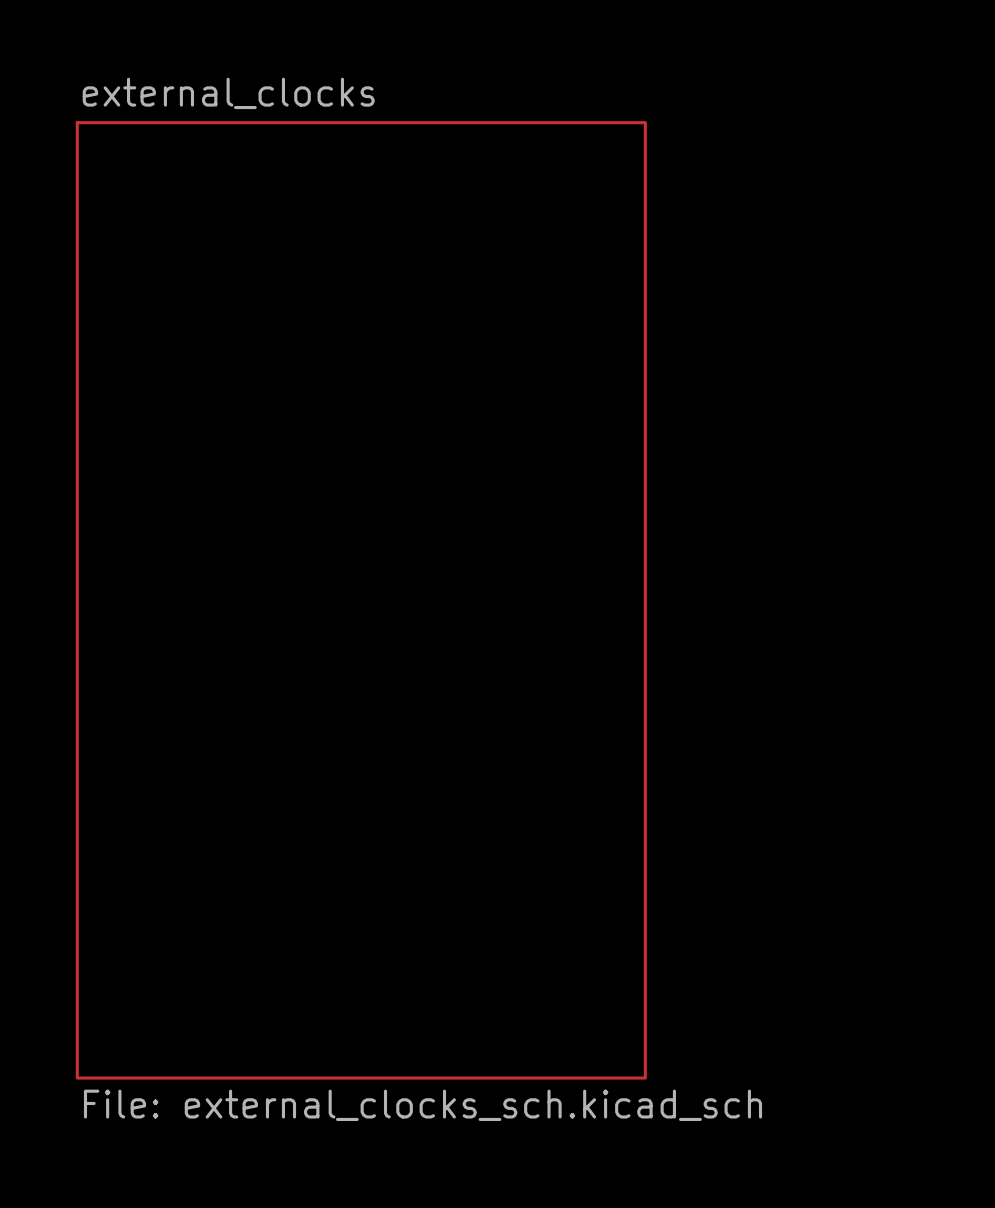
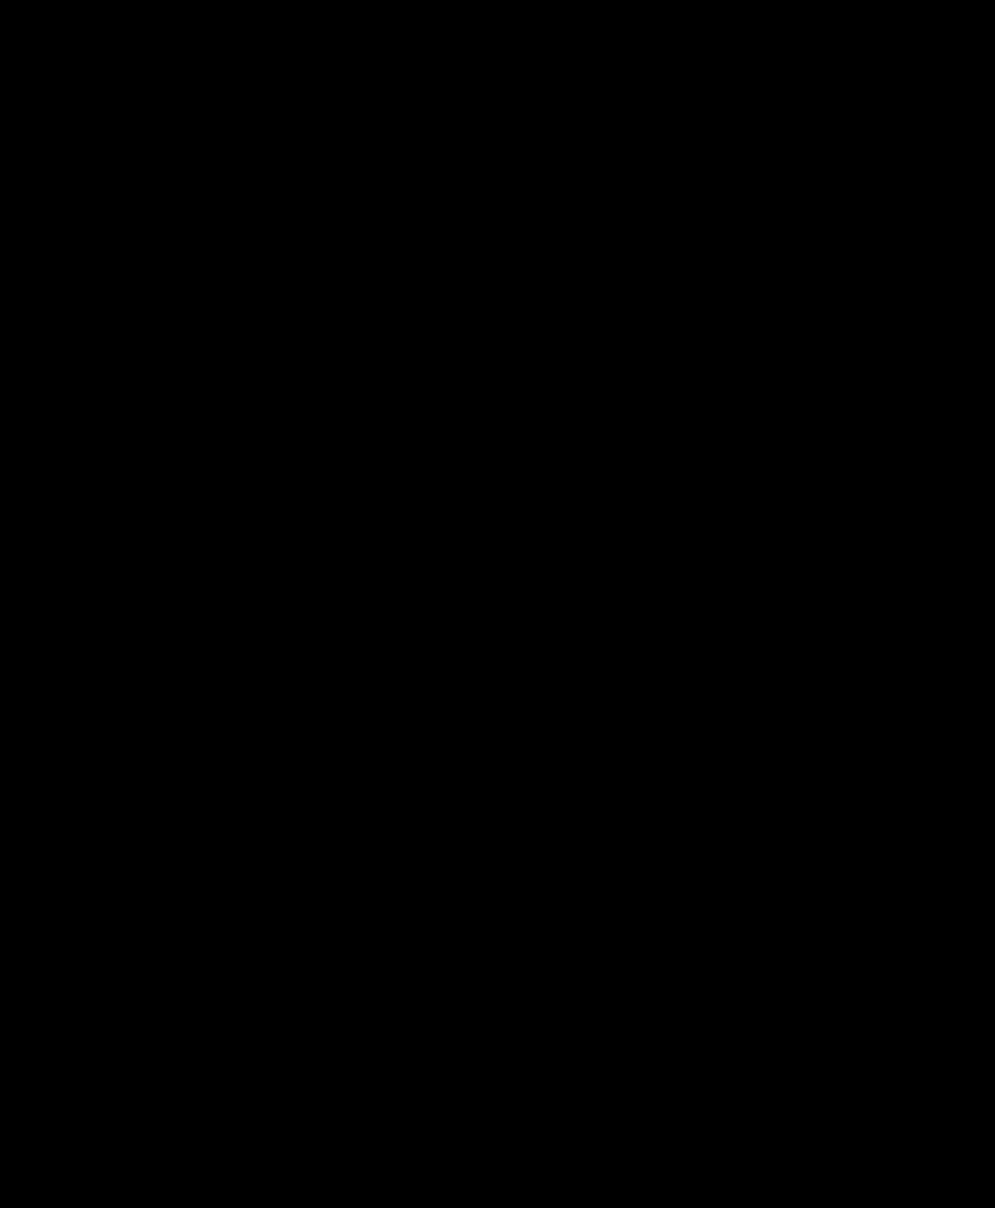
sheet external_clocks: File: external_clocks_sch.kicad_sch (361, 600) -> none

